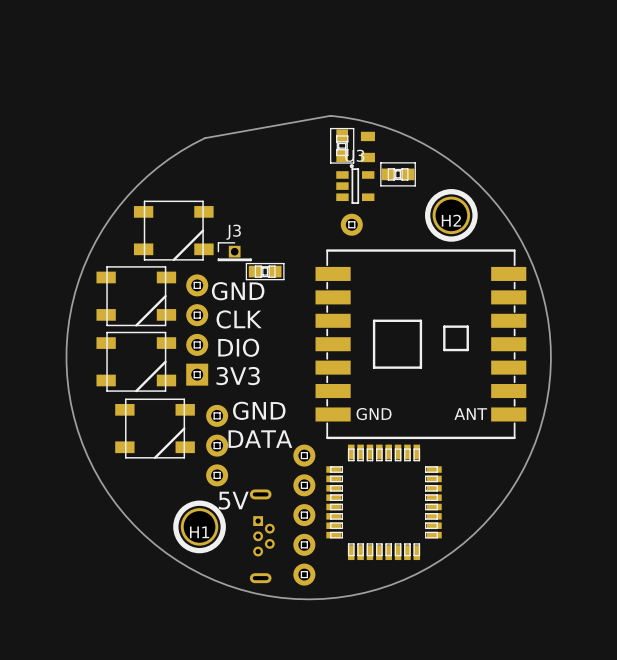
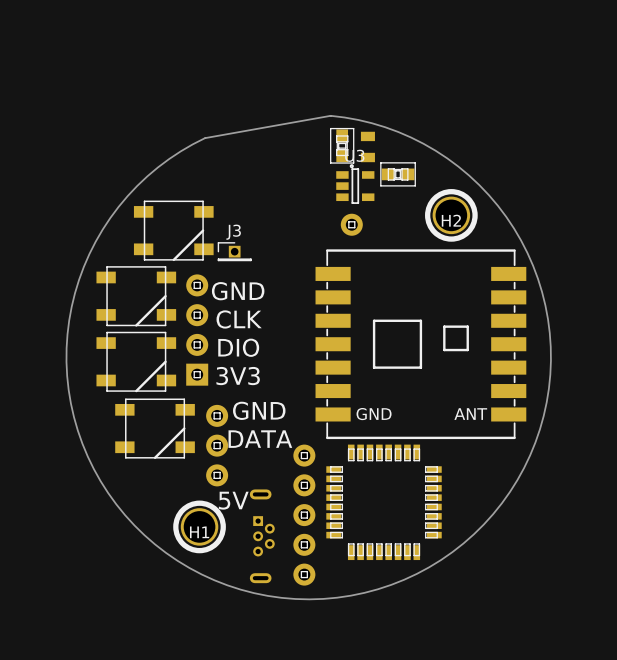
part: (265, 271) -> none

